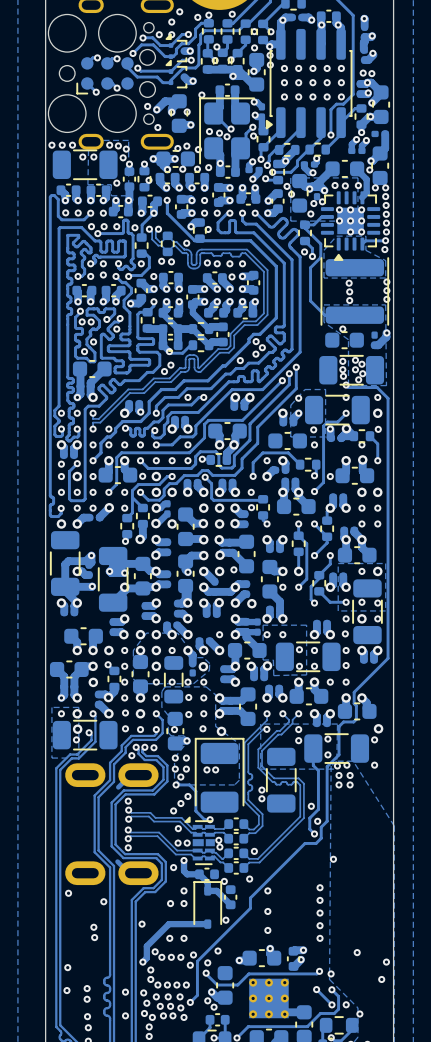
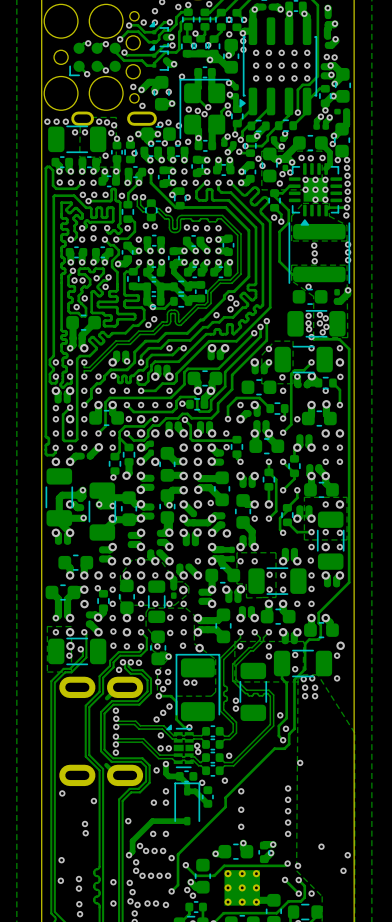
via: (225, 920) -> none
via: (218, 951) -> none
via: (193, 954) -> none
via: (207, 962) -> none
via: (156, 996) -> none
via: (168, 996) -> none
via: (180, 996) -> none
via: (160, 1006) -> none
via: (170, 1006) -> none
via: (180, 1007) -> none
via: (359, 1014) -> none

